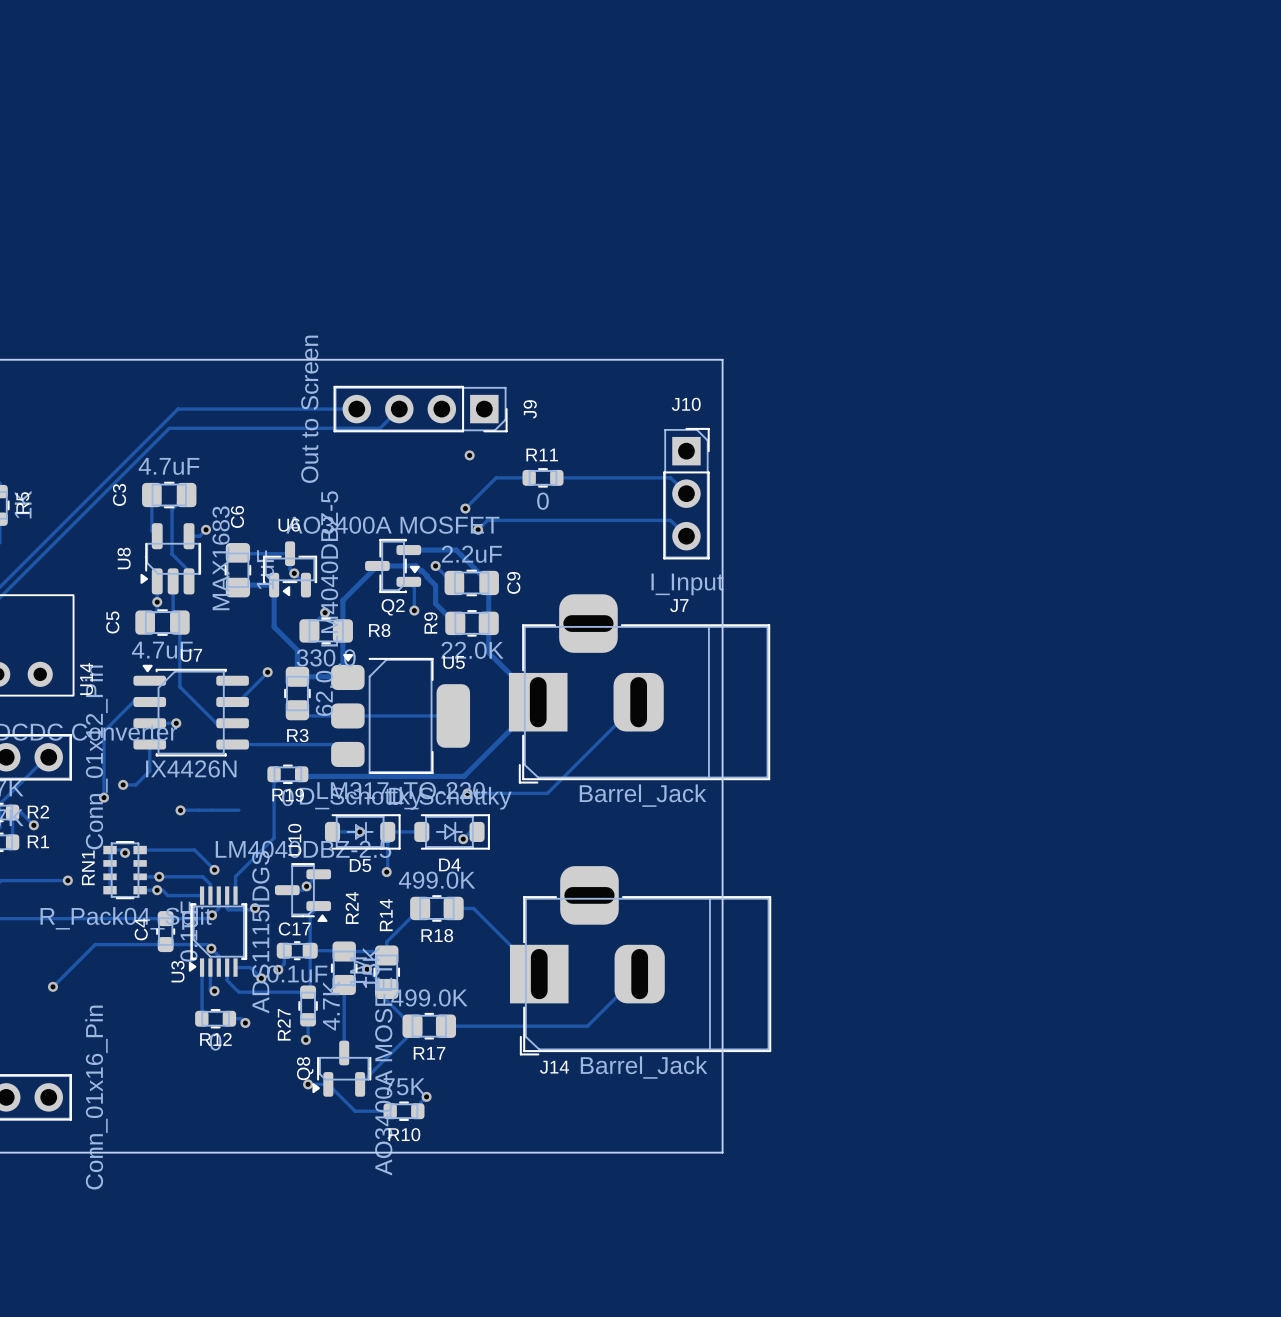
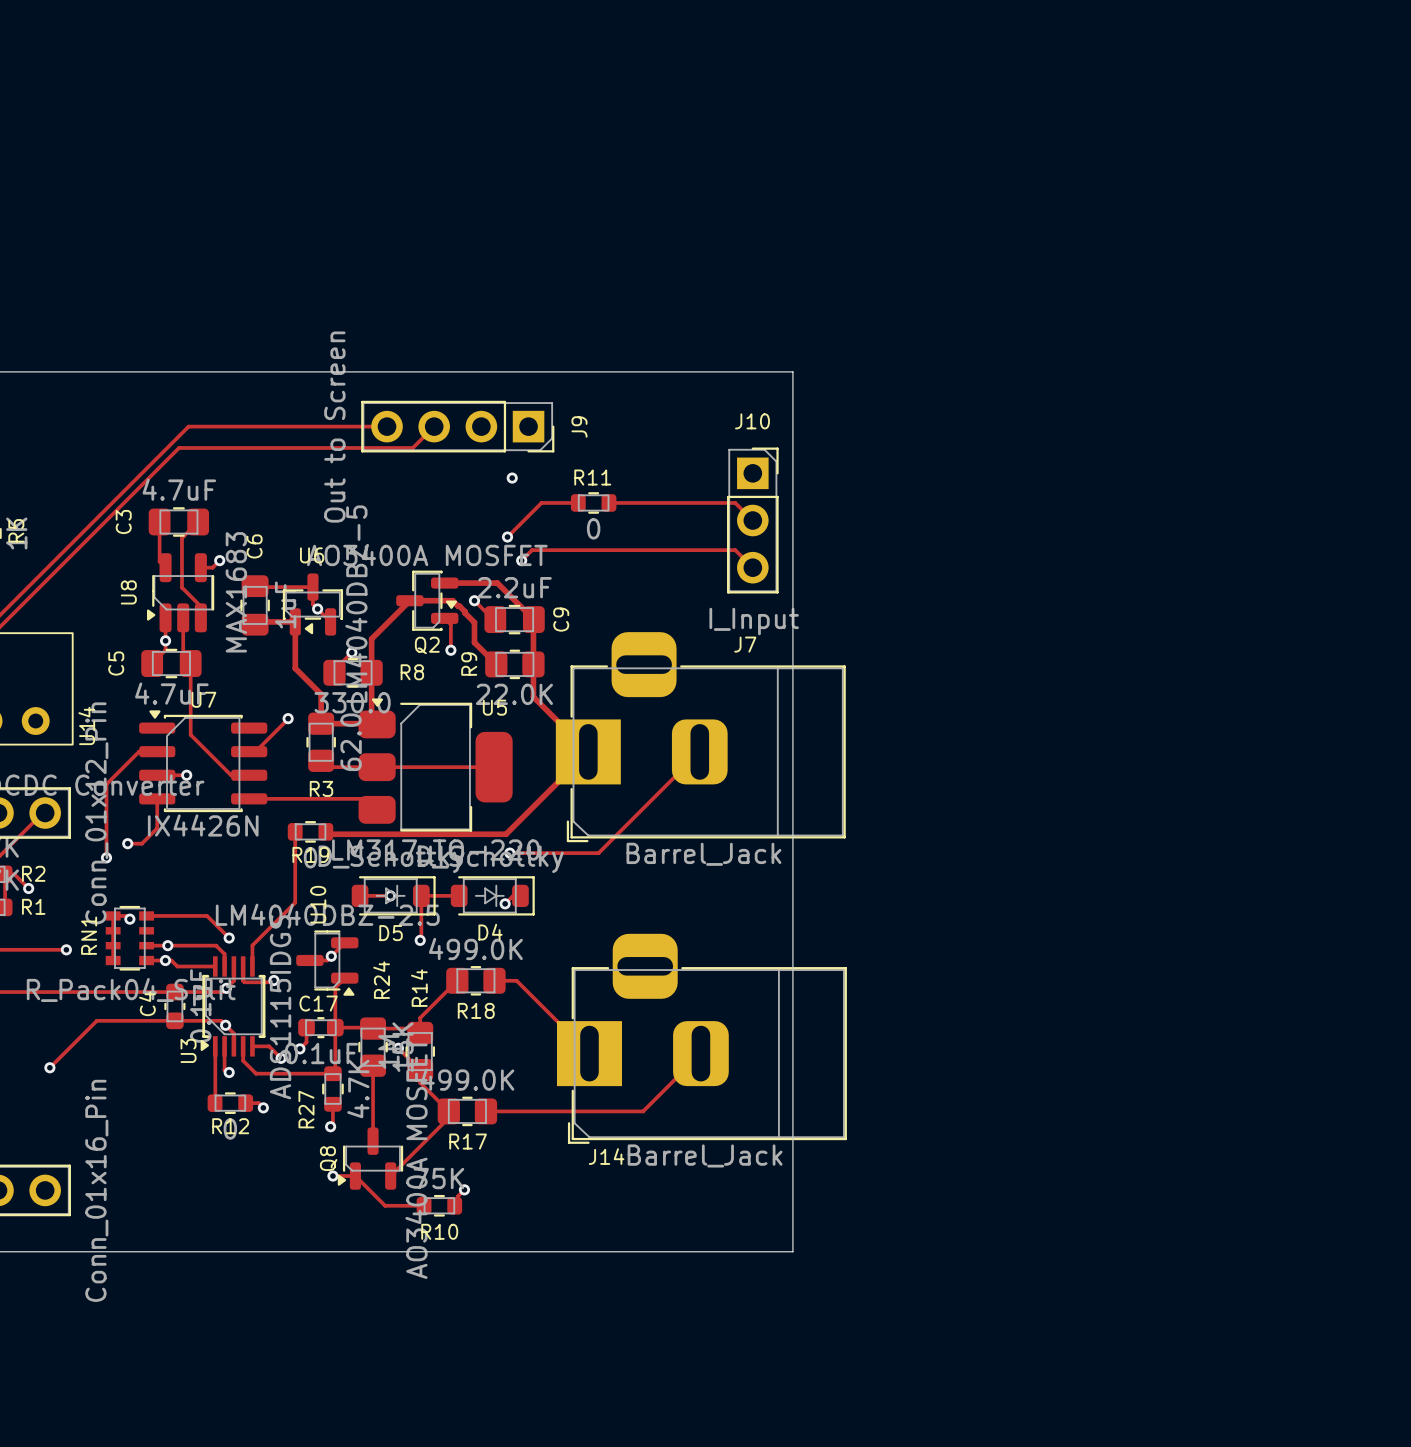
track: (180, 810) (238, 810) -> none
via: (180, 810) -> none

